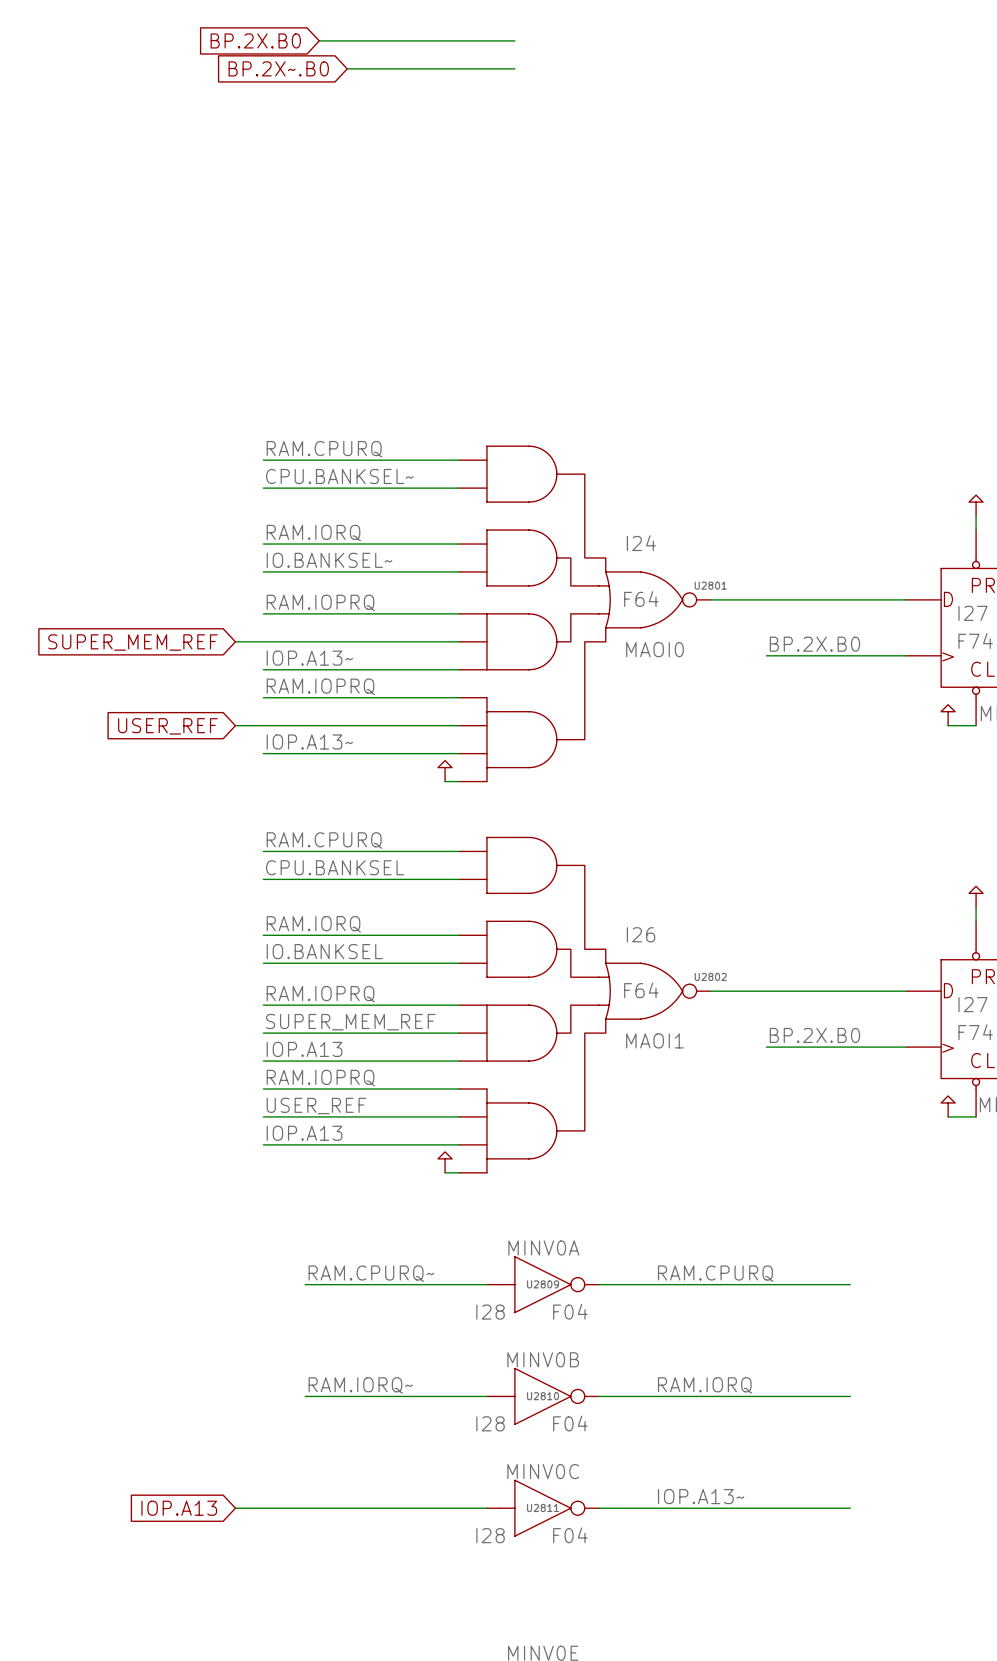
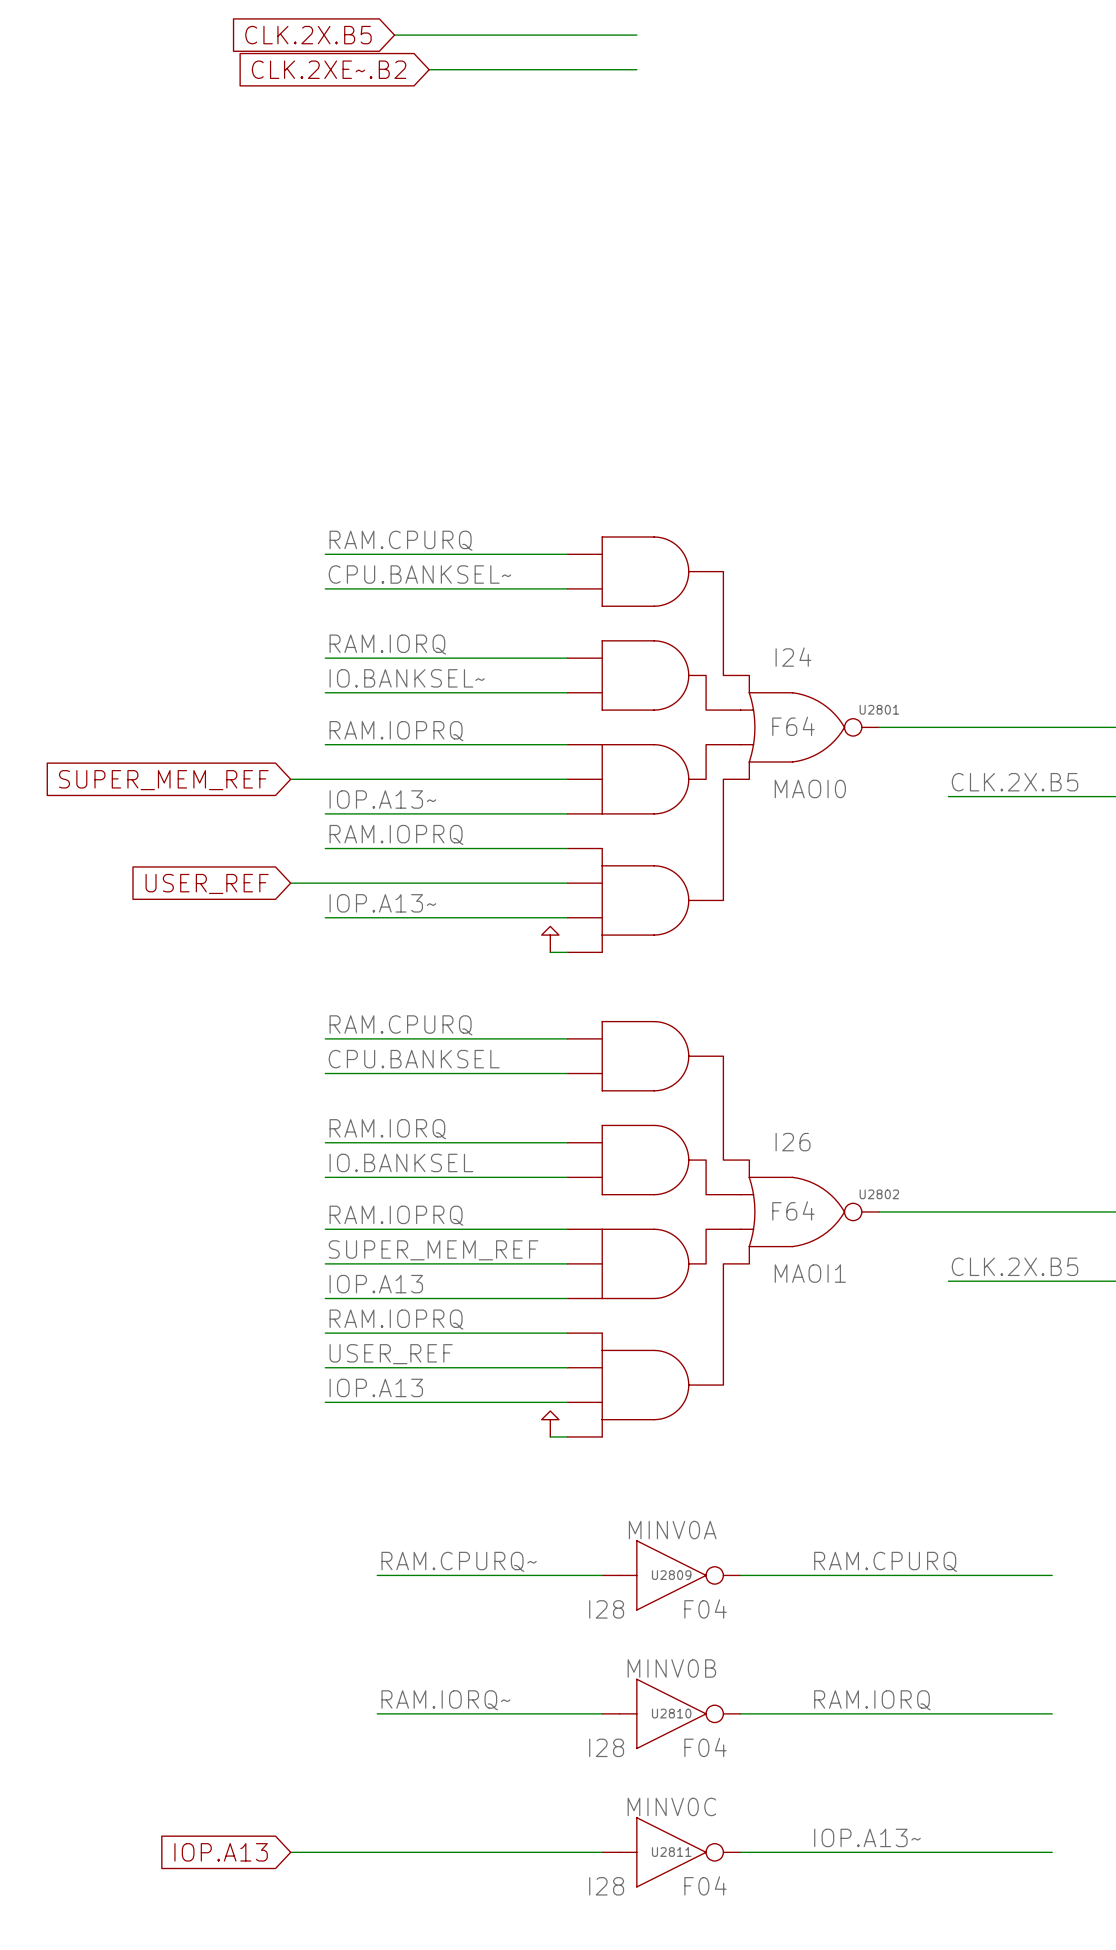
global label: BP.2X.B0 (255, 40) -> CLK.2X.B5 (308, 35)
global label: BP.2X~.B0 (278, 68) -> CLK.2XE~.B2 (329, 69)
label: BP.2X.B0 (814, 644) -> CLK.2X.B5 (1014, 782)
label: BP.2X.B0 (814, 1035) -> CLK.2X.B5 (1014, 1266)

